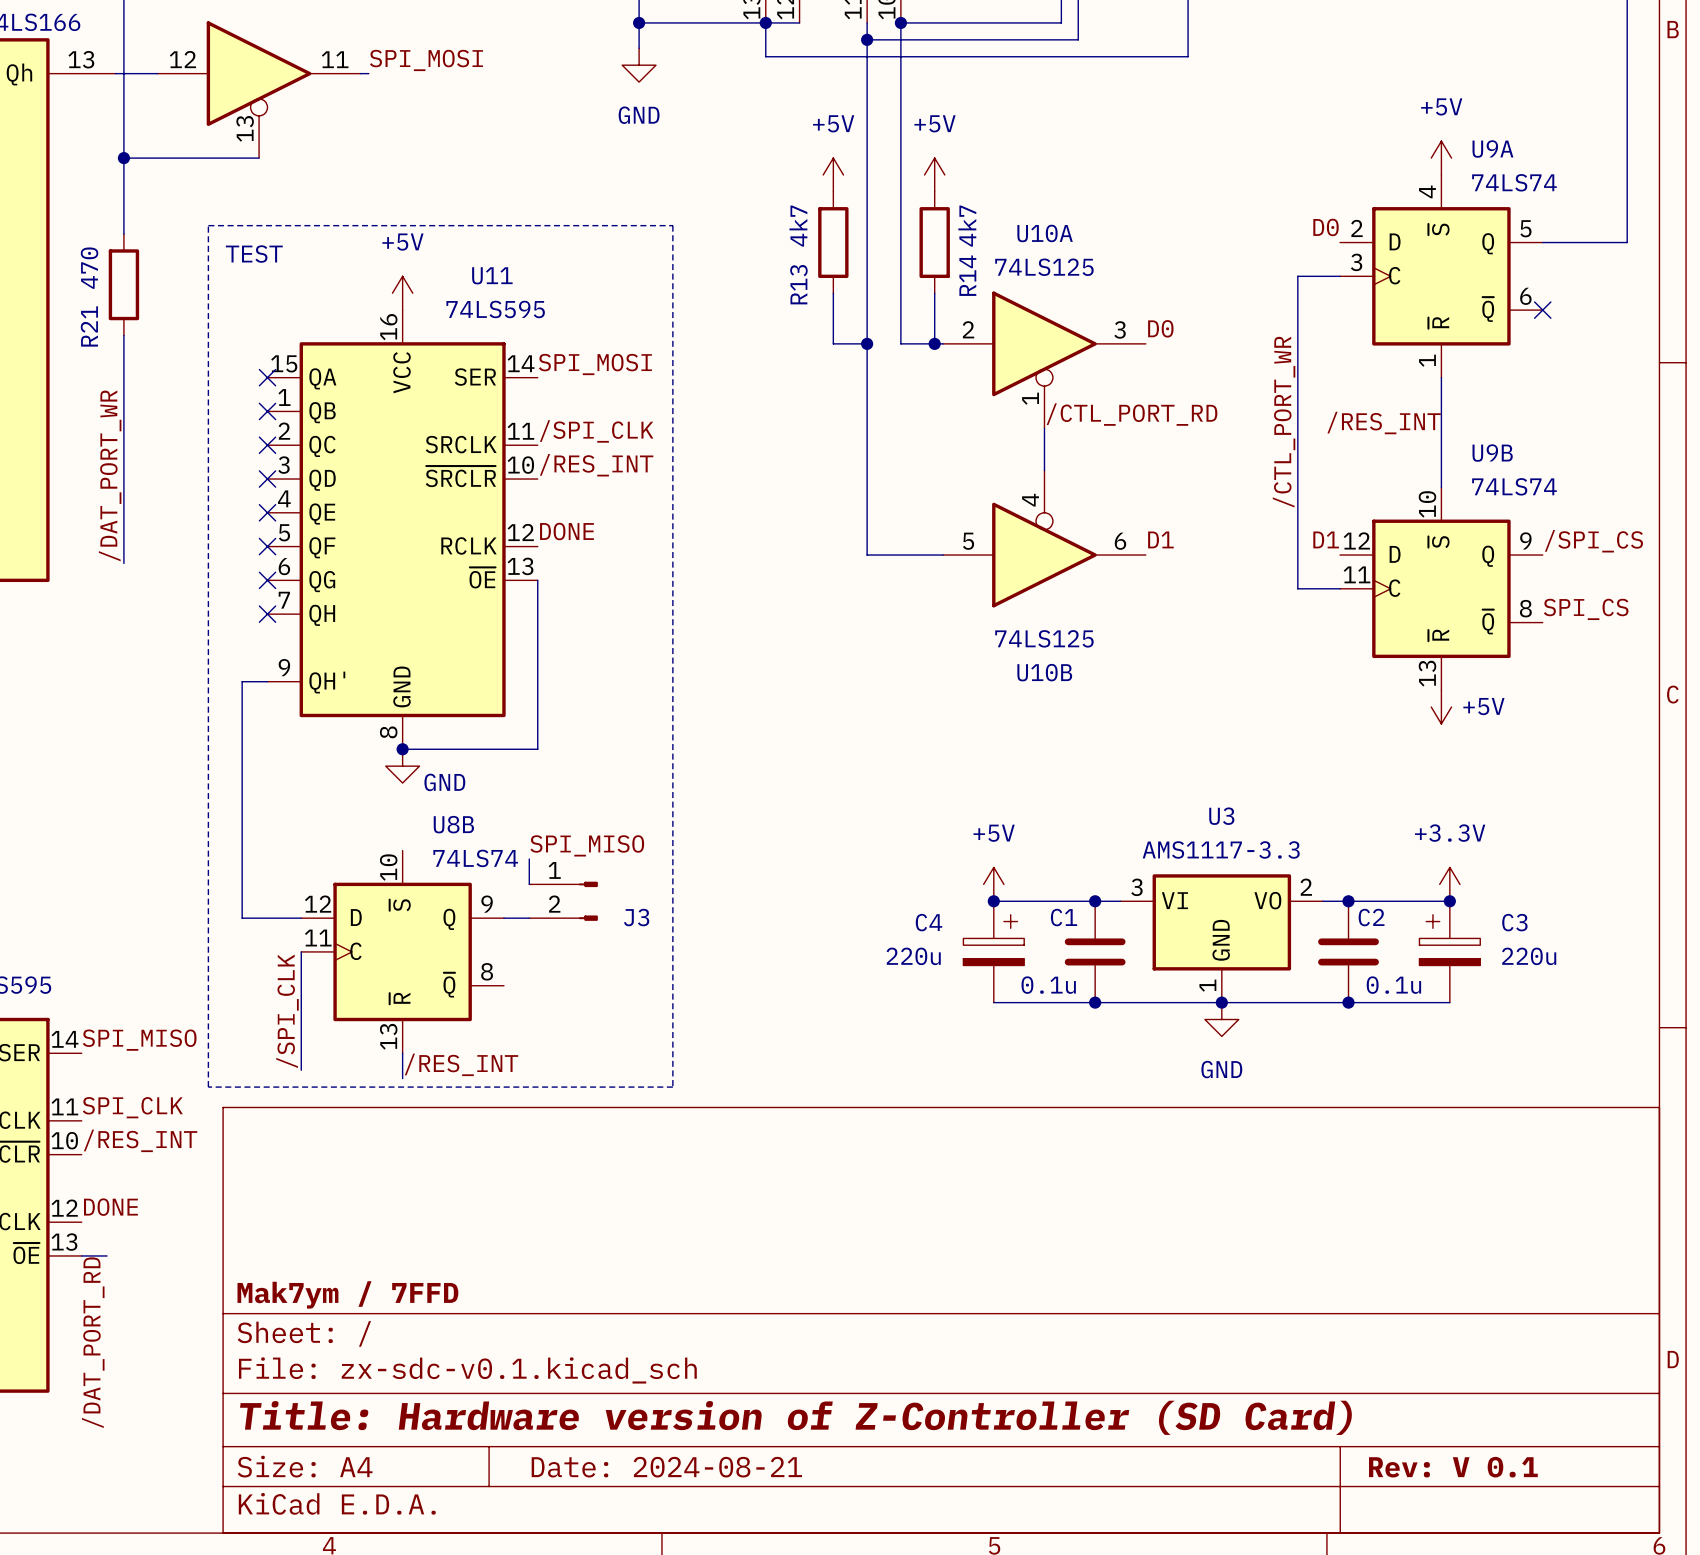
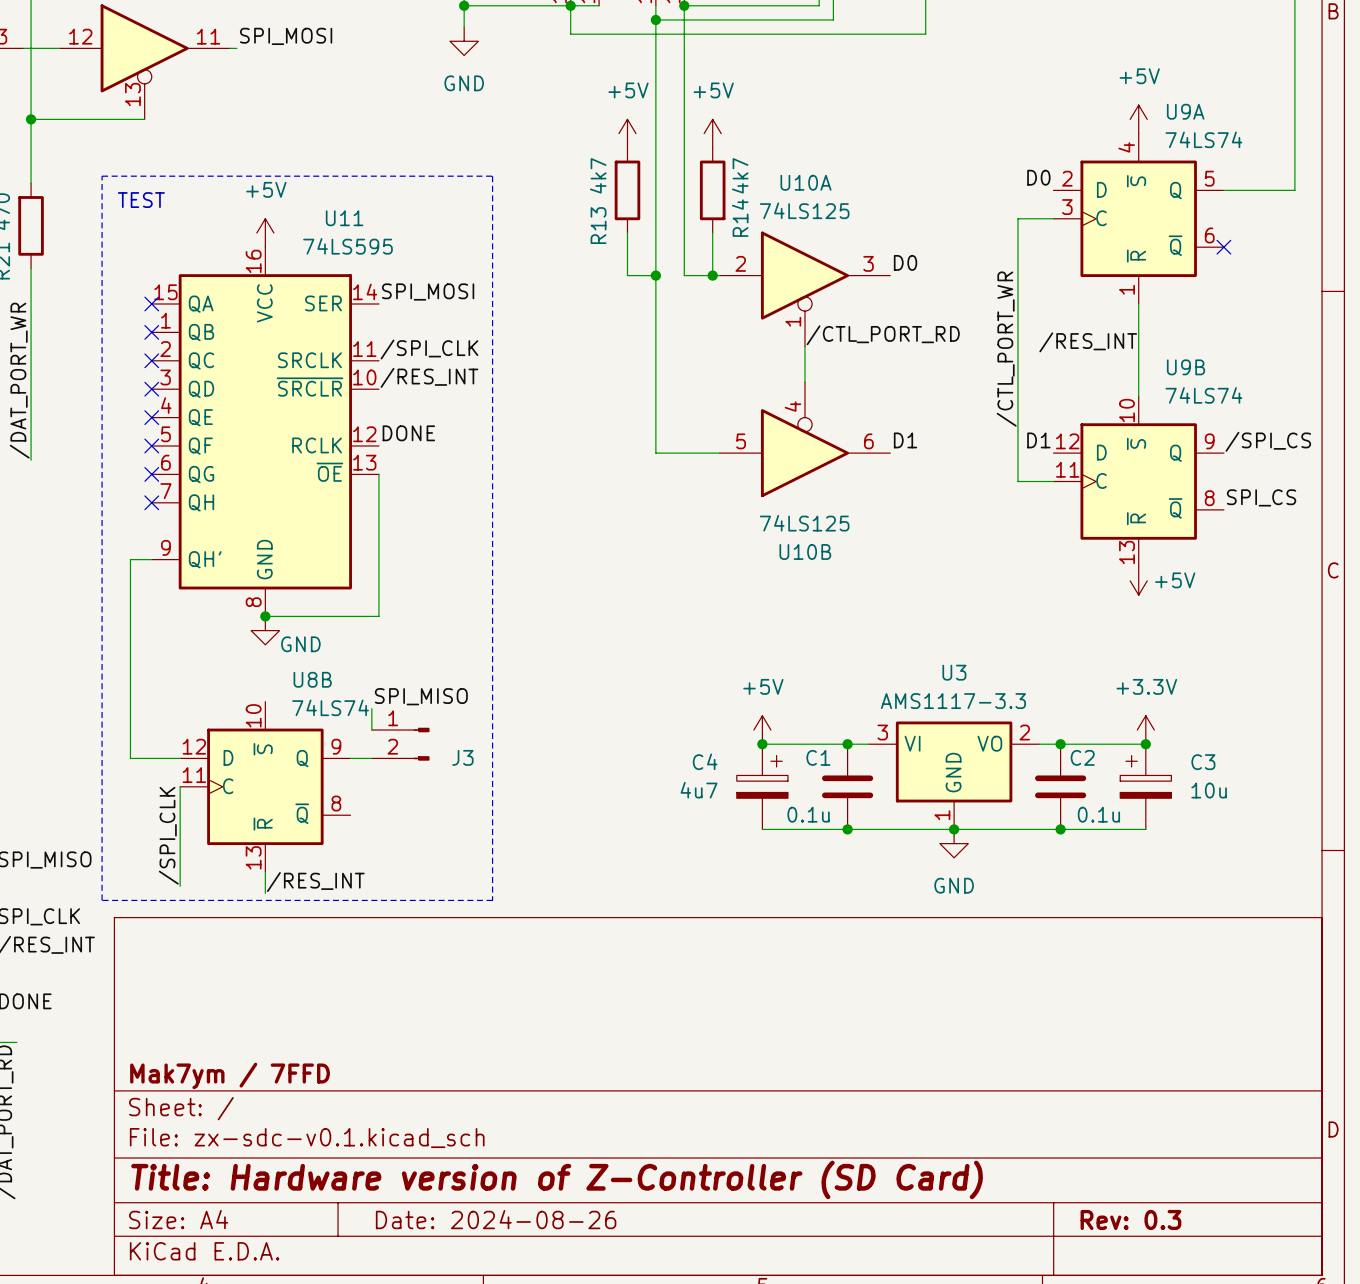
C4 value: 220u (913, 956) -> 4u7 (699, 790)
C3 value: 220u (1529, 956) -> 10u (1209, 790)
title block: Date: 2024-08-21 (666, 1467) -> Date: 2024-08-26 (496, 1219)
title block: Rev: V 0.1 (1453, 1467) -> Rev: 0.3 (1130, 1219)

